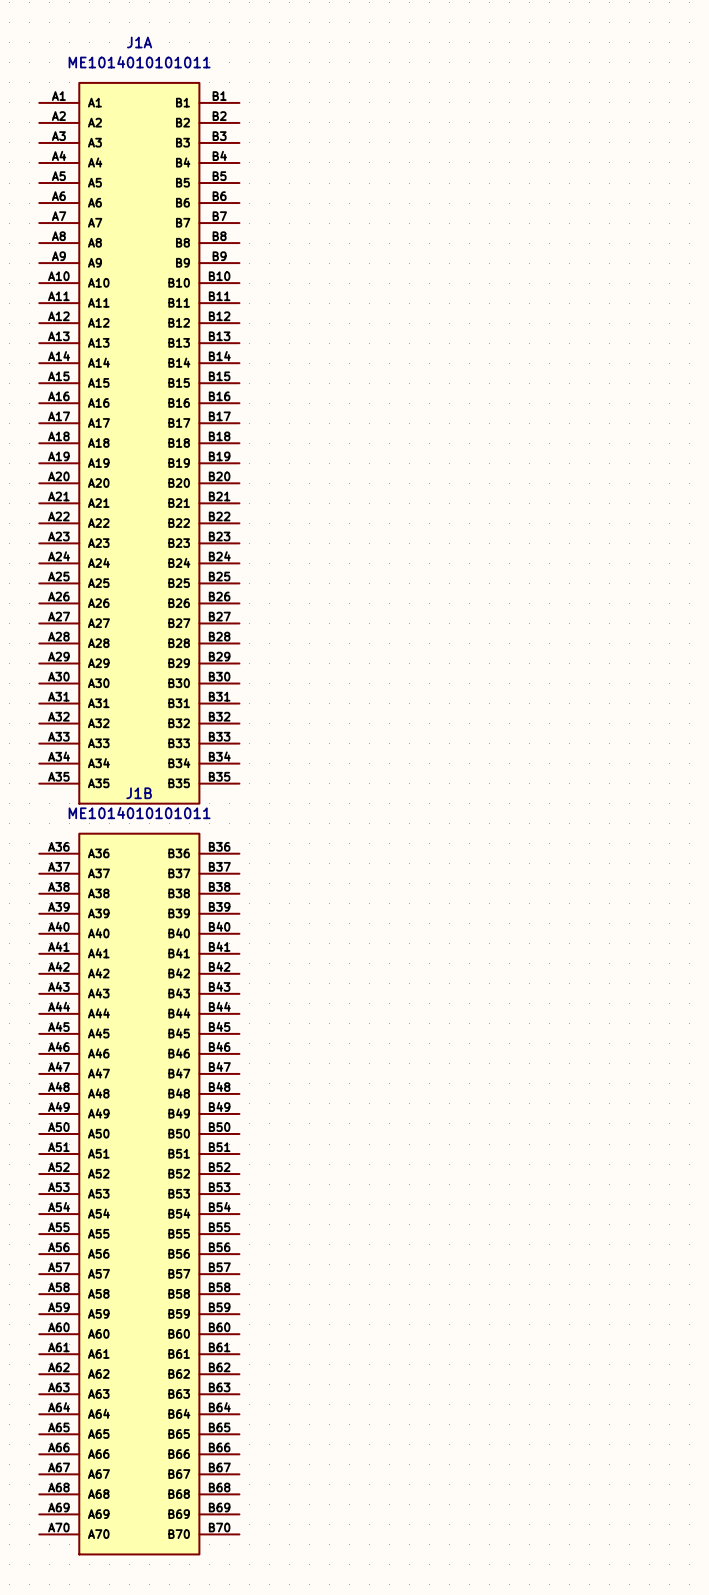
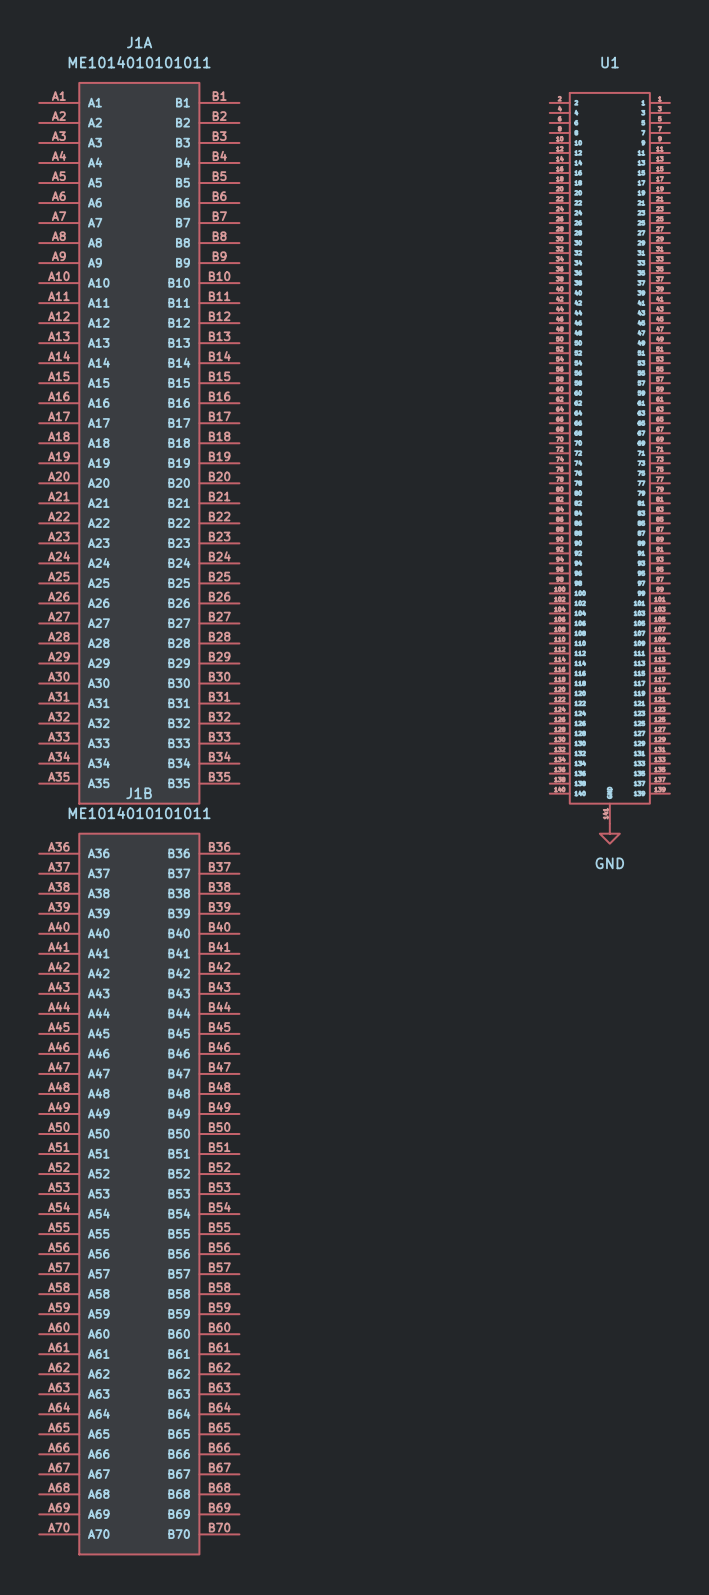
U1: none -> (609, 458)
power symbol: none -> GND (609, 833)

